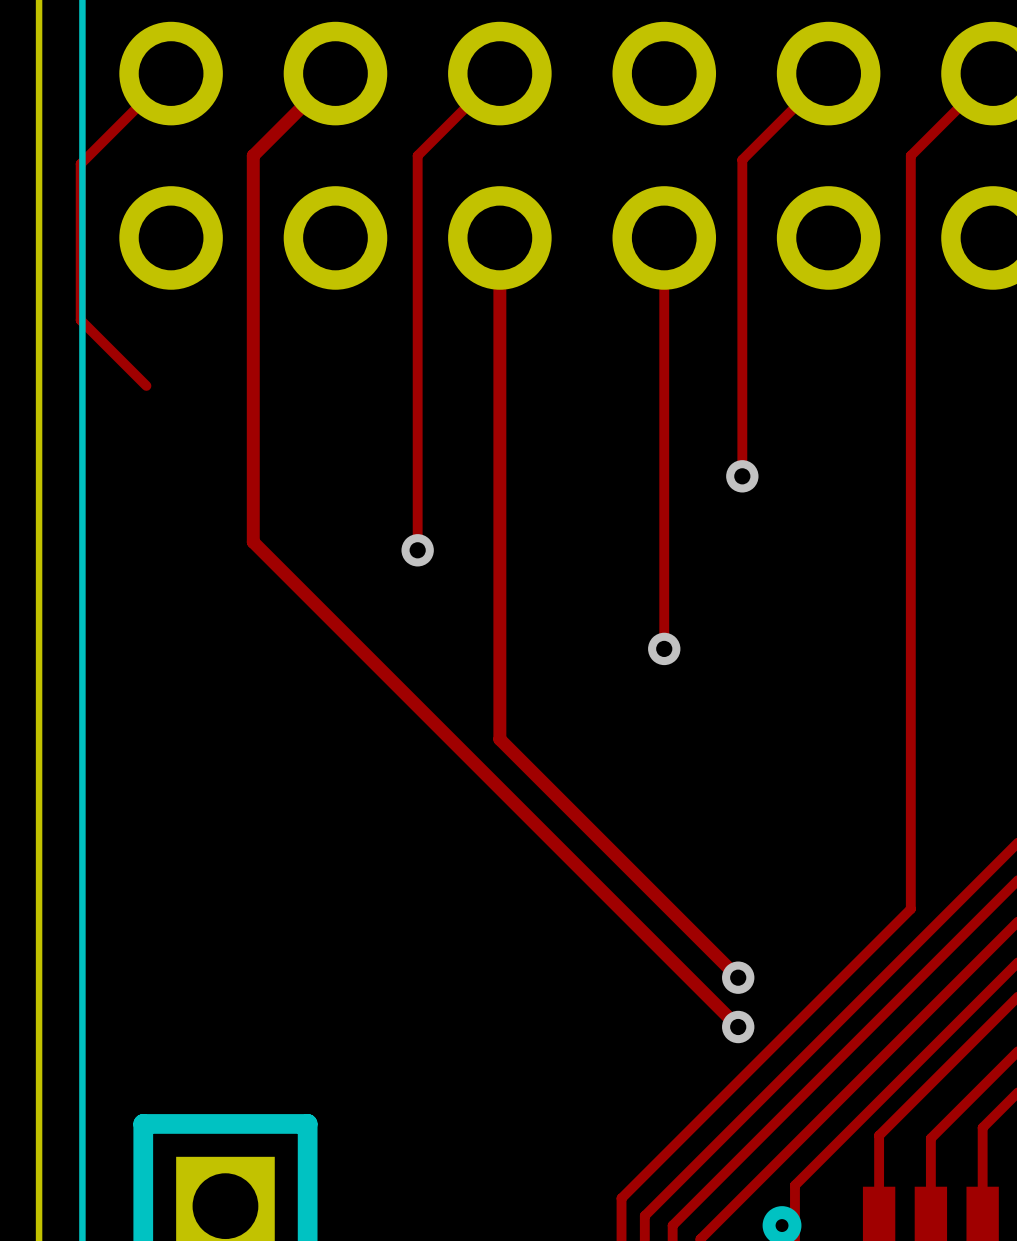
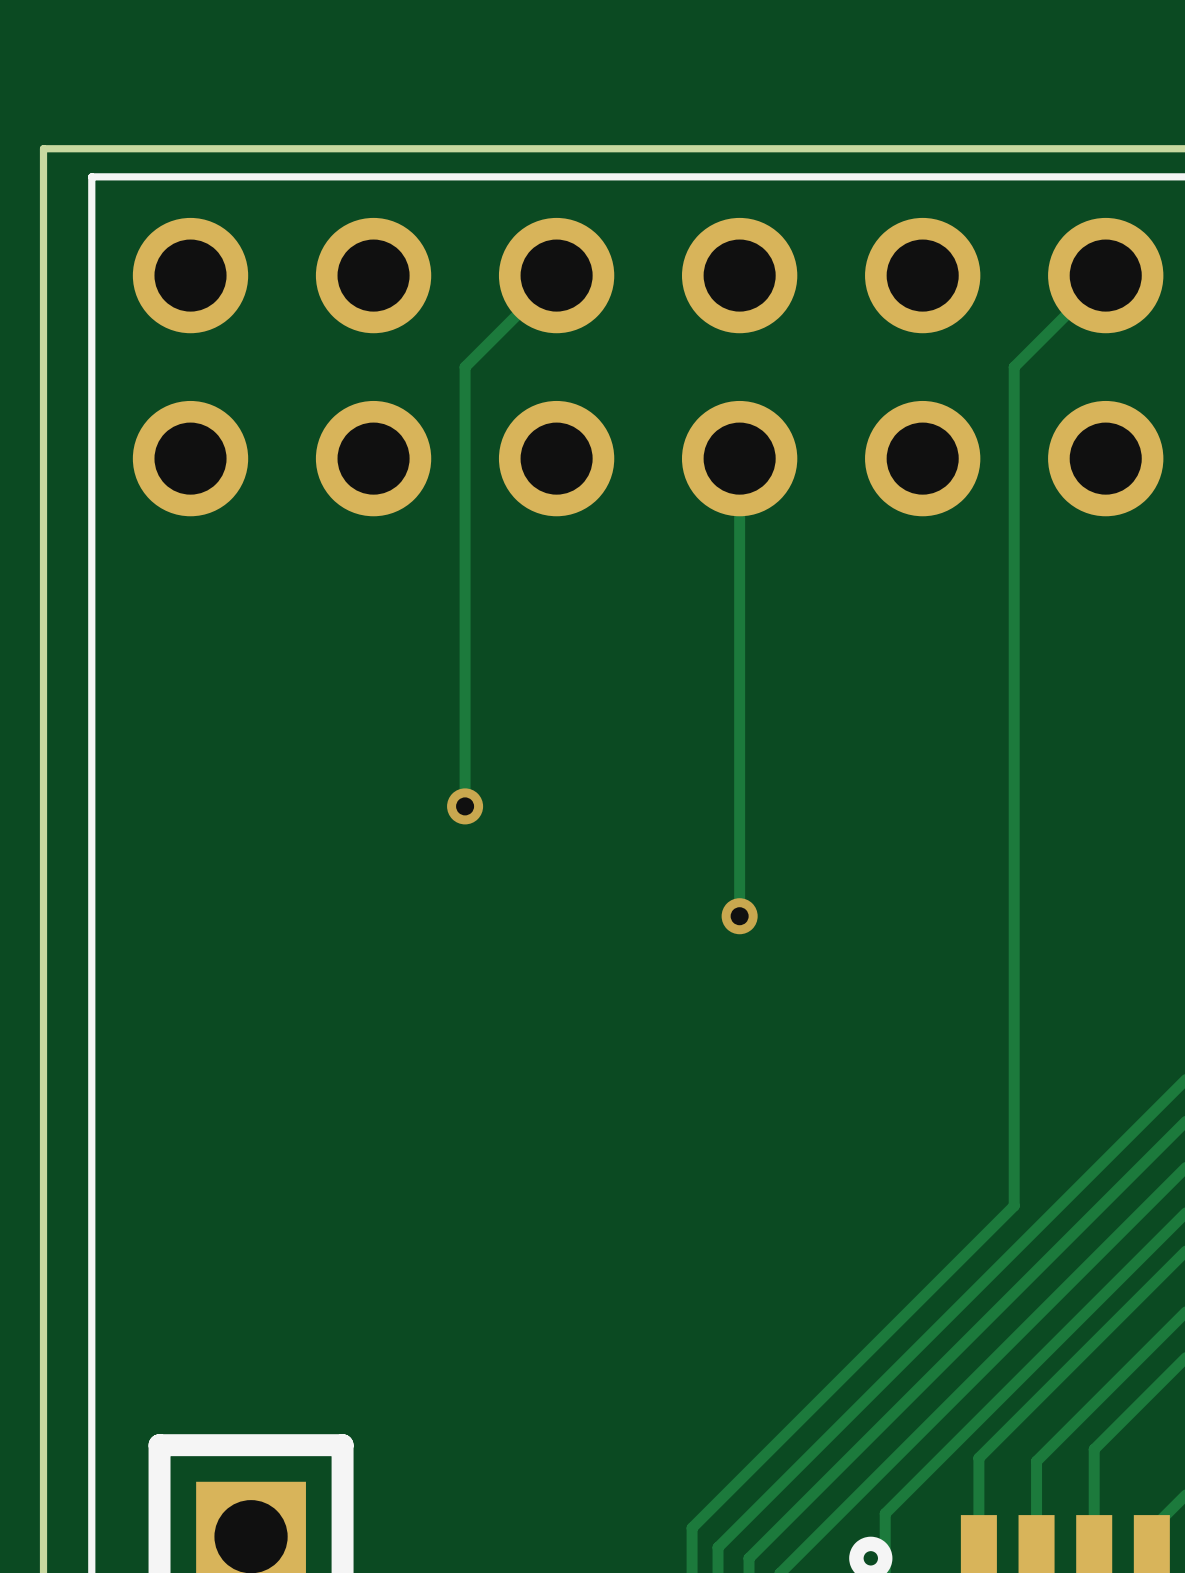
track: (171, 73) (80, 163) (80, 320) (146, 385) -> none
track: (335, 73) (253, 155) (253, 542) (738, 1027) -> none
track: (828, 73) (742, 159) (742, 476) -> none
track: (499, 237) (499, 739) (738, 977) -> none
via: (742, 476) -> none
via: (738, 977) -> none
via: (738, 1027) -> none

